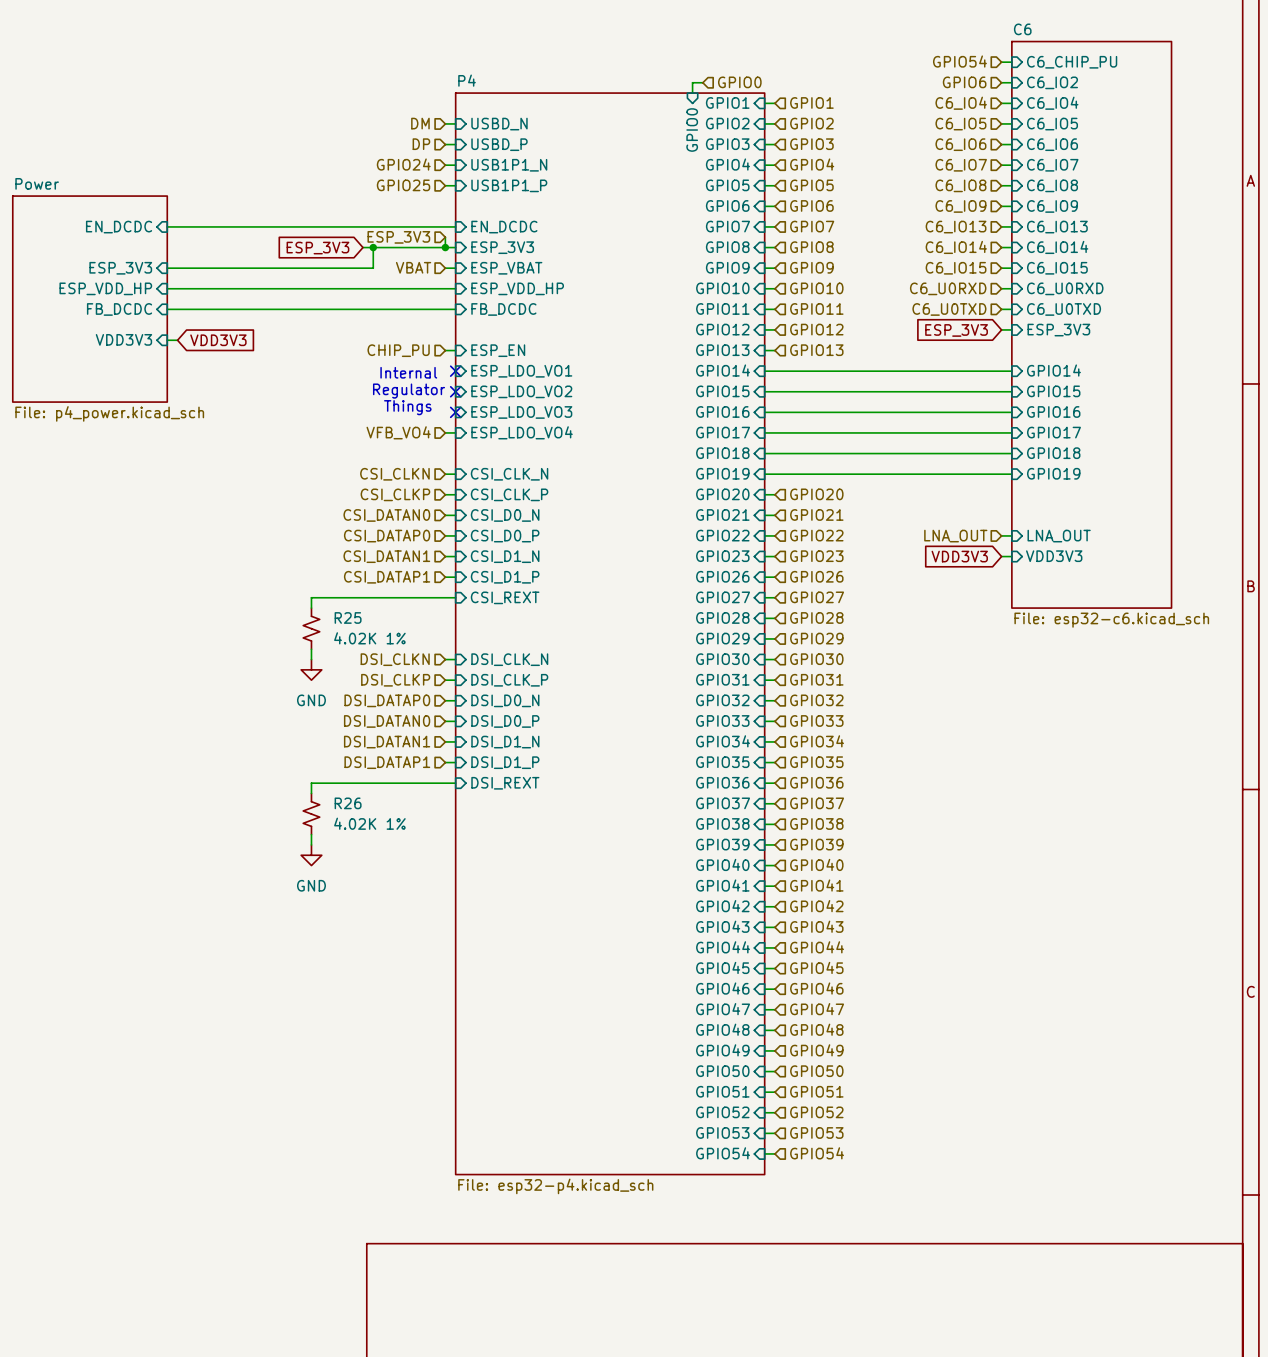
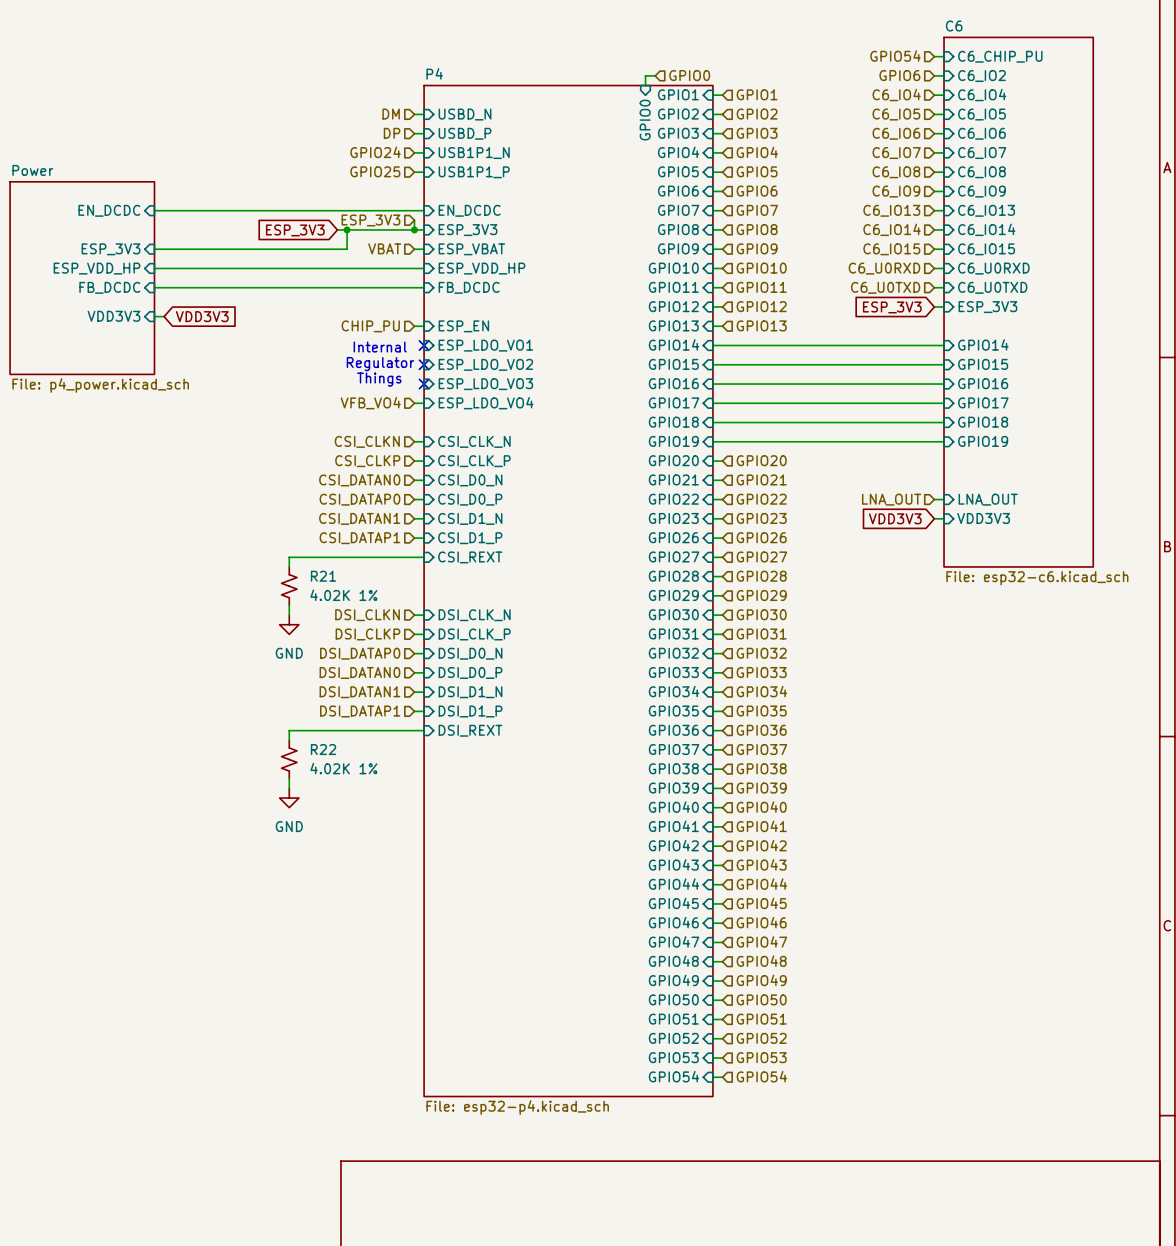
R25 name: R25 (348, 617) -> R21 (323, 576)
R26 name: R26 (348, 803) -> R22 (323, 749)

